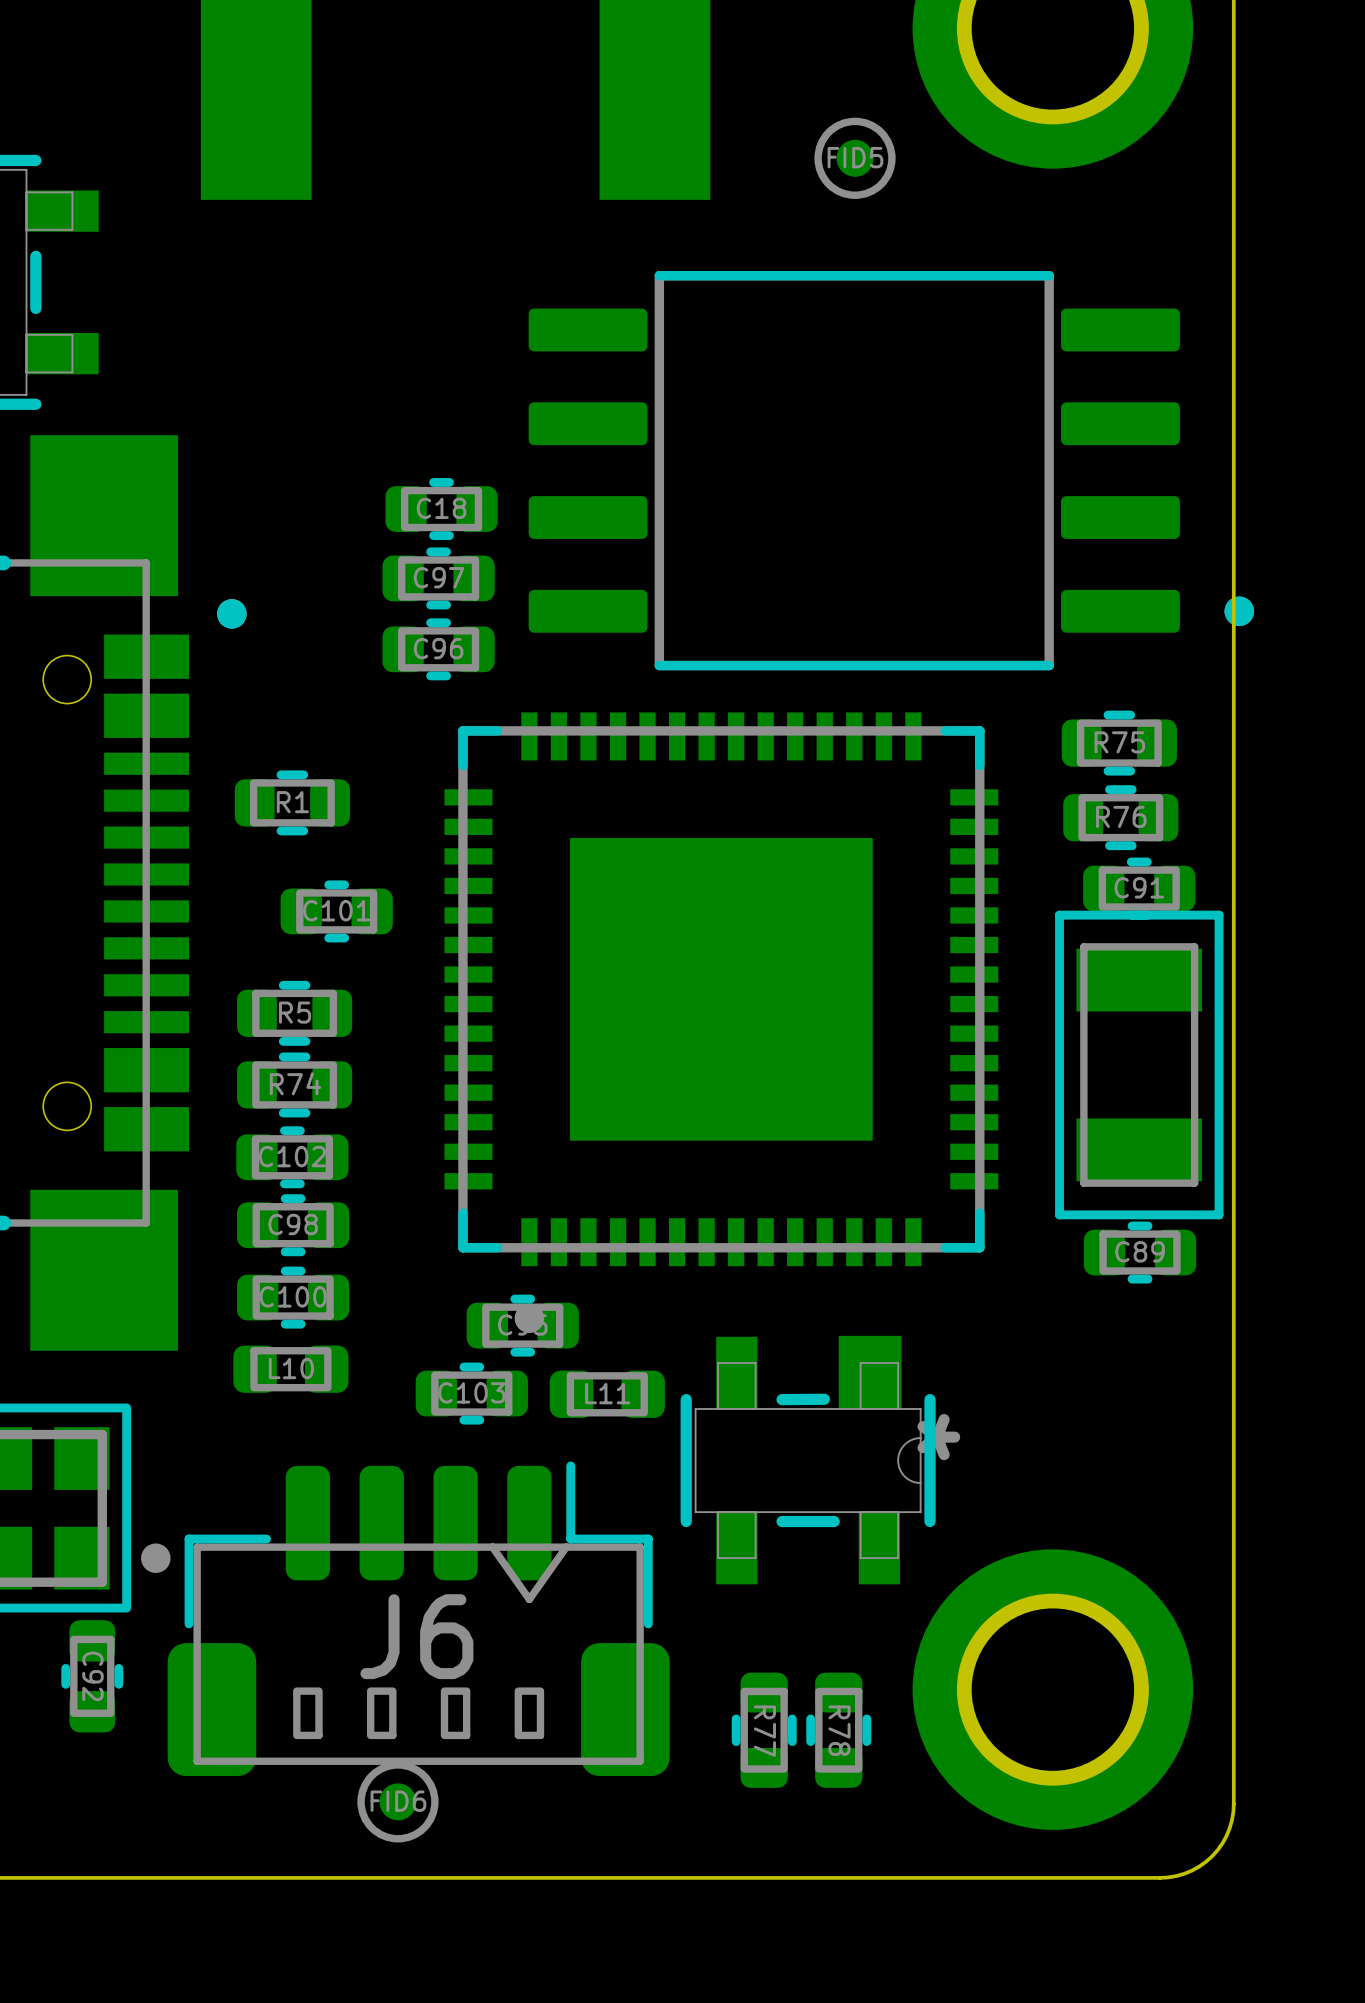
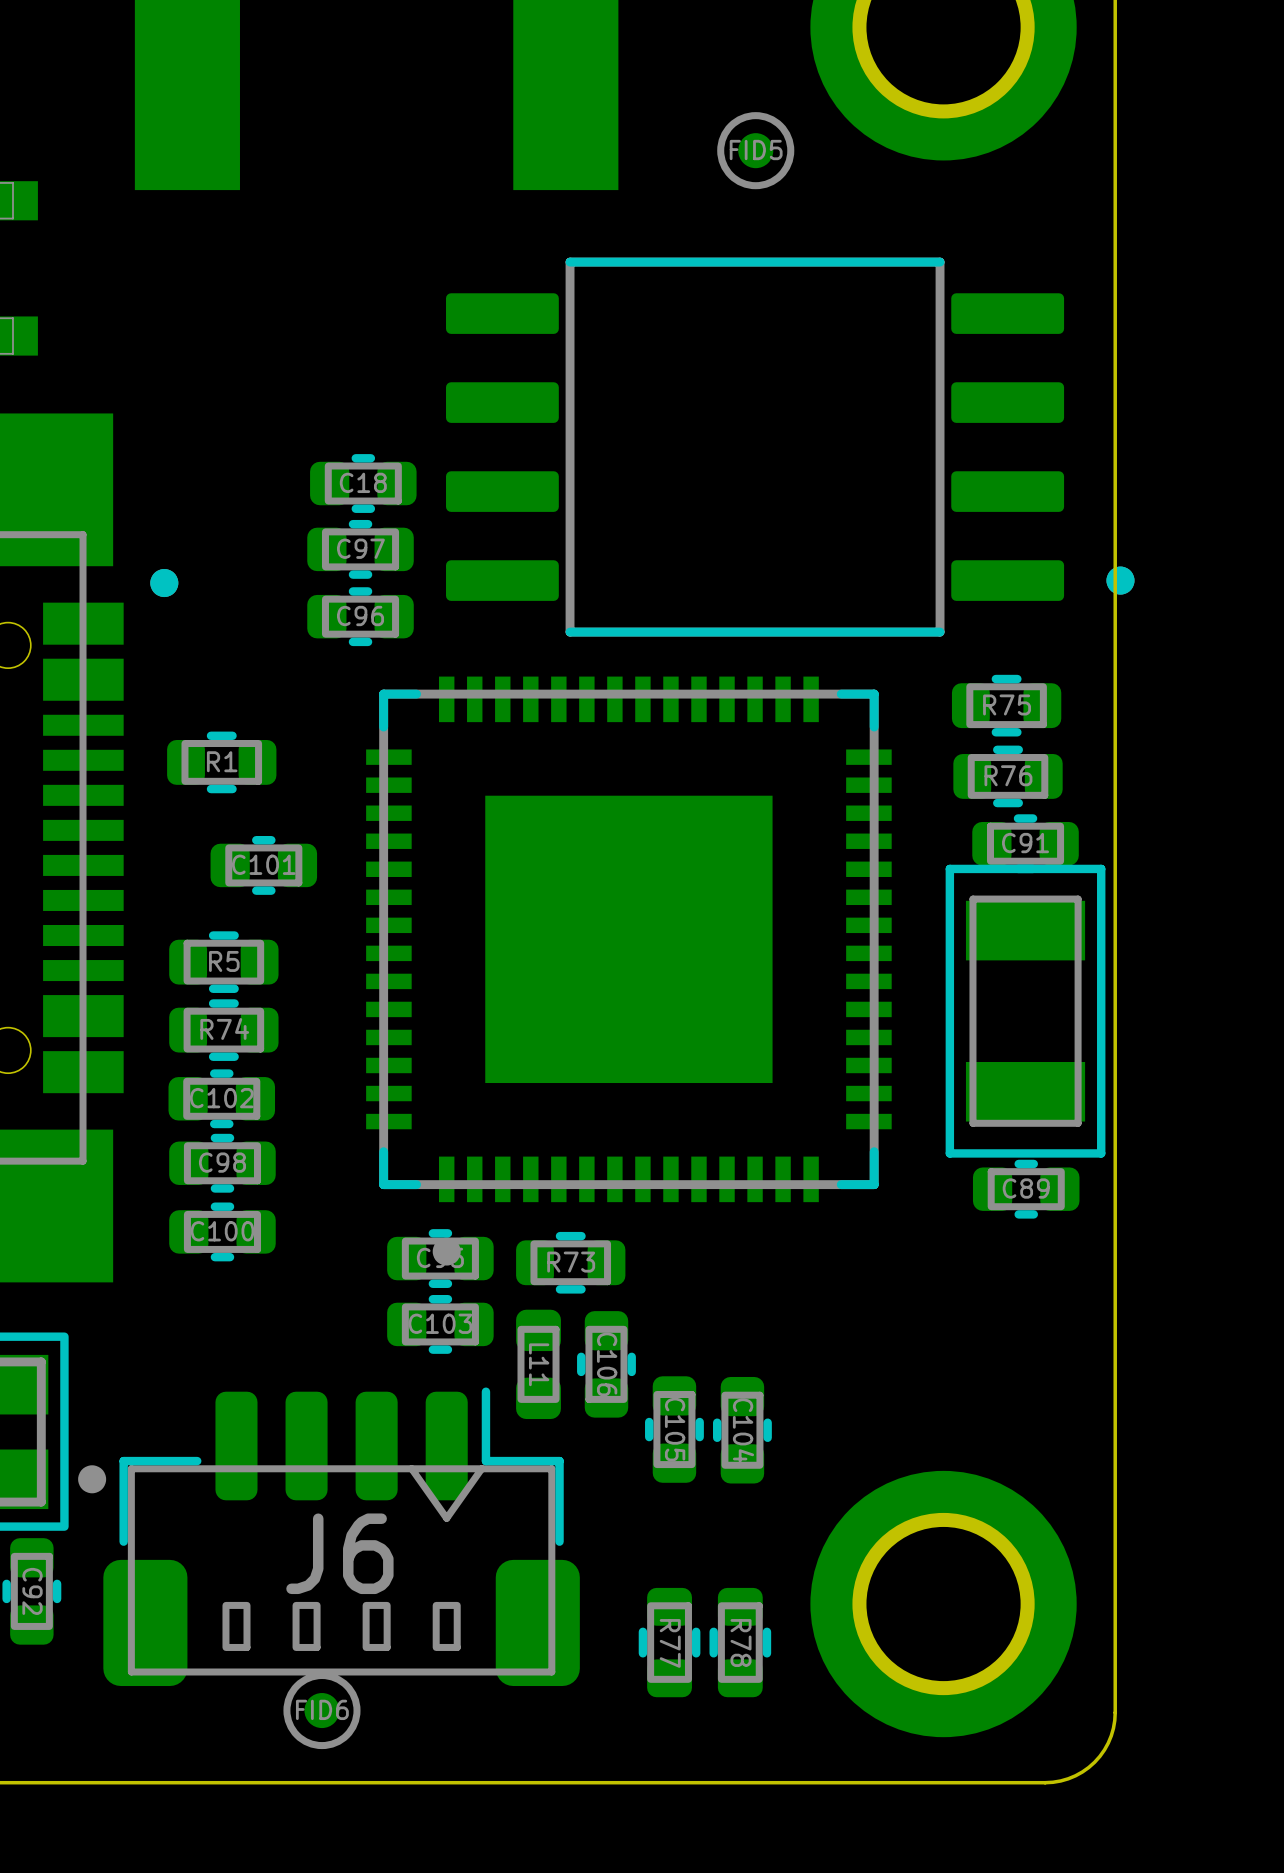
R73: none -> (570, 1262)
L10: (290, 1369) -> none
C103 position: (471, 1393) -> (440, 1324)
L11 rotation: 0° (607, 1394) -> 90° clockwise (538, 1364)
C106: none -> (606, 1364)
part: (808, 1460) -> none
C105: none -> (674, 1429)
C104: none -> (742, 1430)

